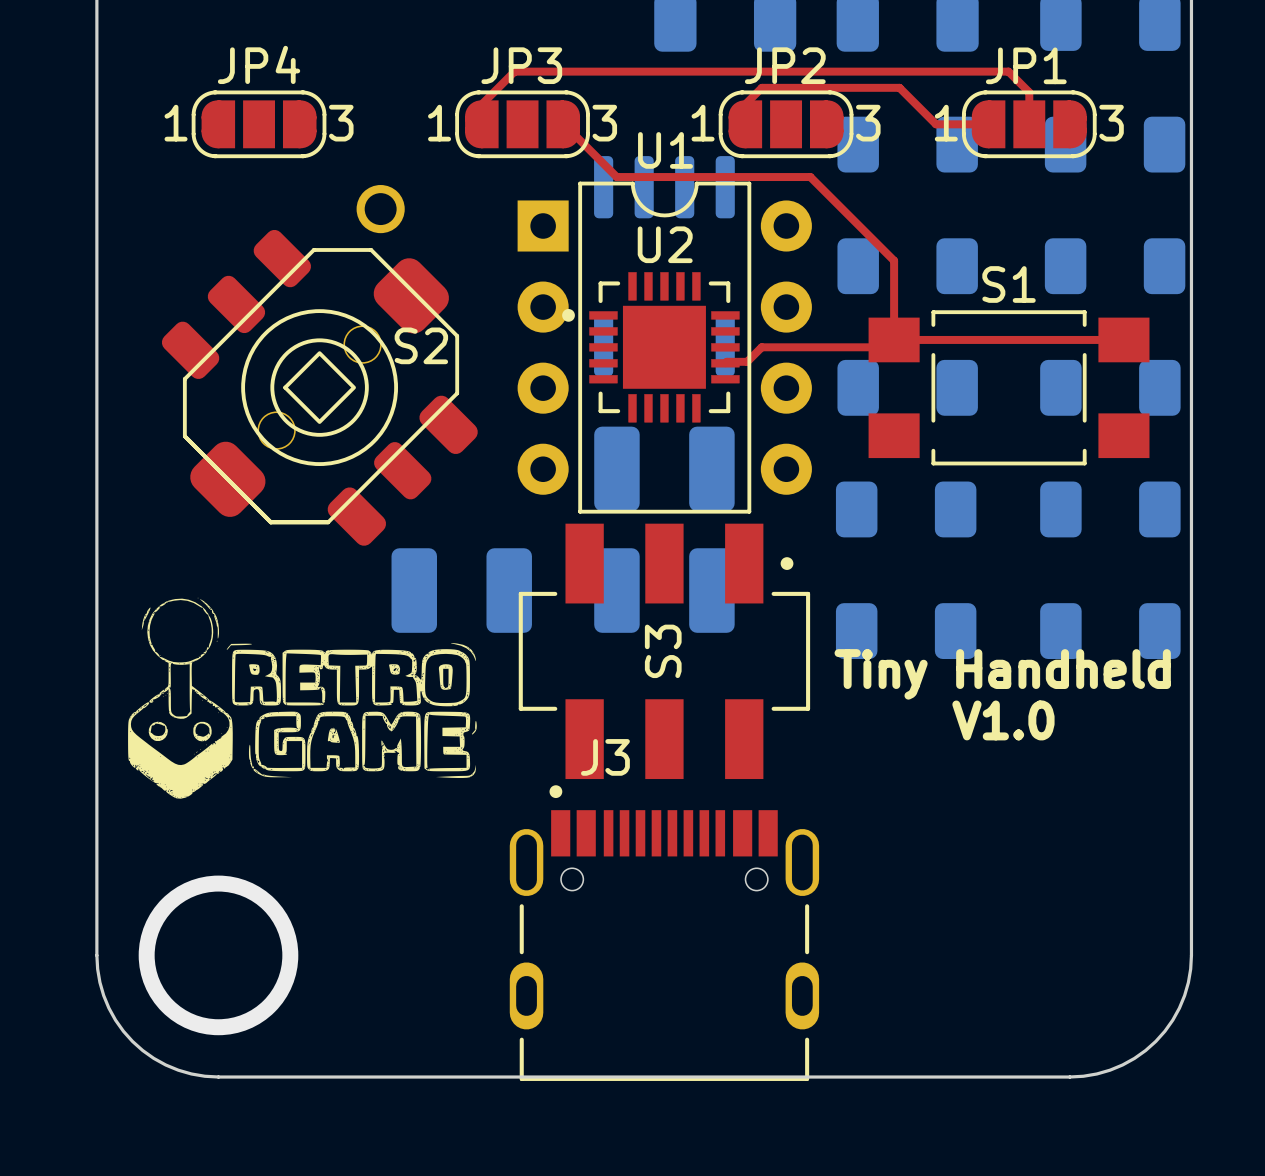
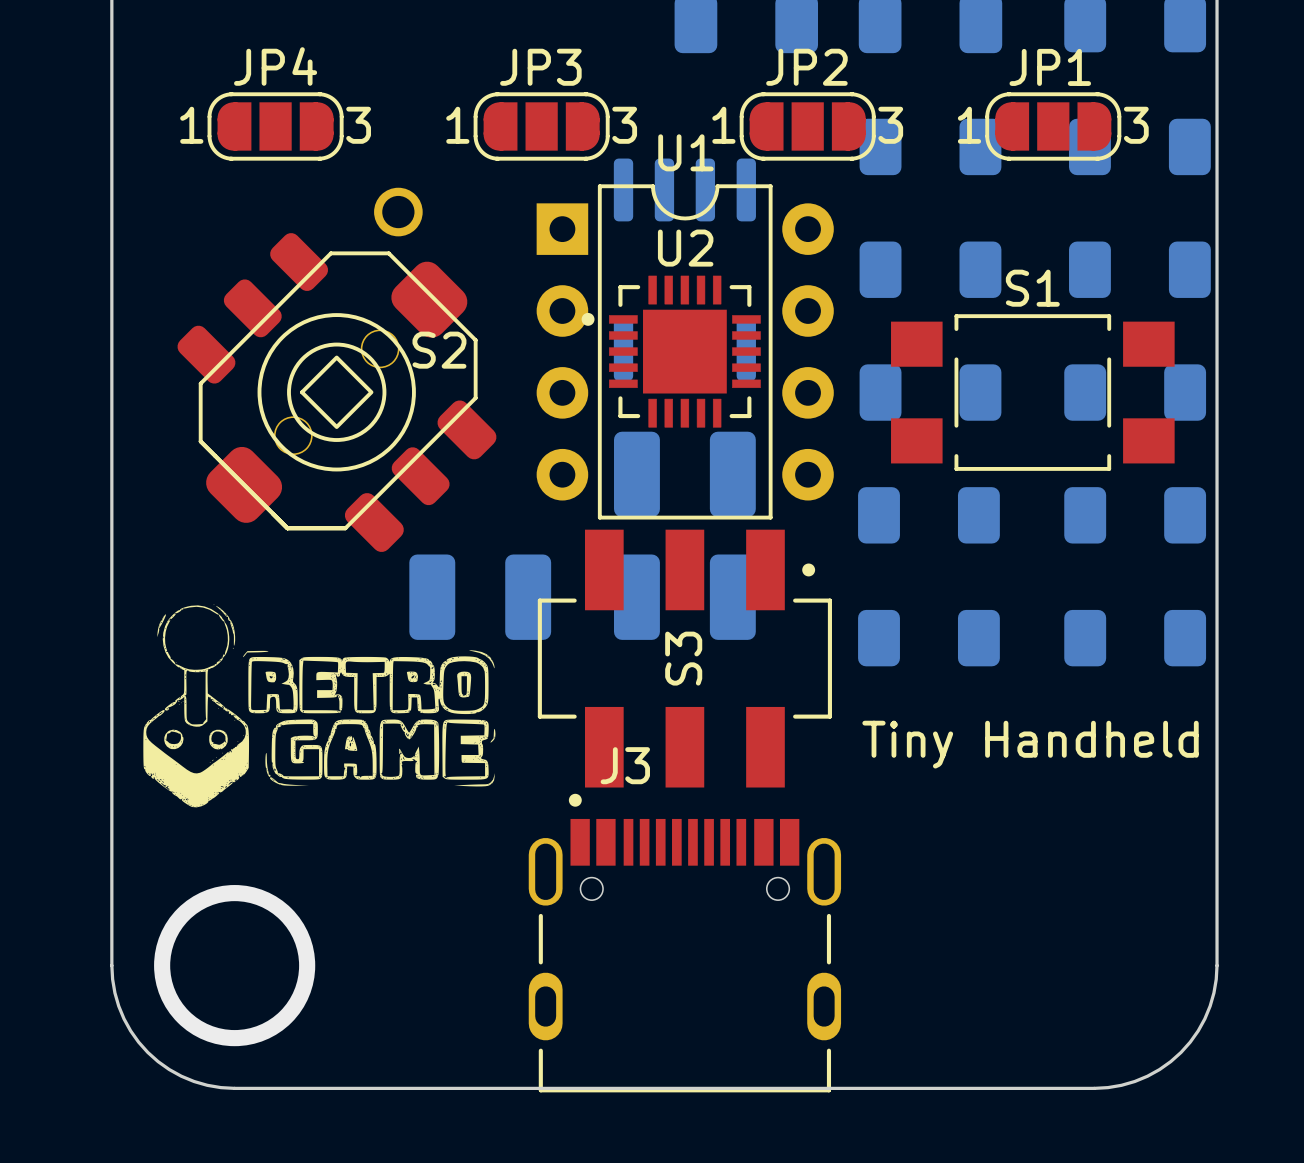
top track: (481, 124) (481, 105) (514, 71) (1008, 71) (1029, 92) (1029, 124) -> none
top track: (564, 124) (616, 177) (810, 177) (894, 260) (894, 339) -> none
top track: (744, 124) (744, 105) (761, 87) (899, 87) (936, 124) (987, 124) -> none
top track: (894, 339) (1123, 339) -> none
top track: (894, 339) (886, 347) (761, 347) (747, 361) (725, 363) -> none
text: Tiny Handheld (1002, 674) -> none
text: V1.0 (1003, 720) -> Tiny Handheld (1030, 744)

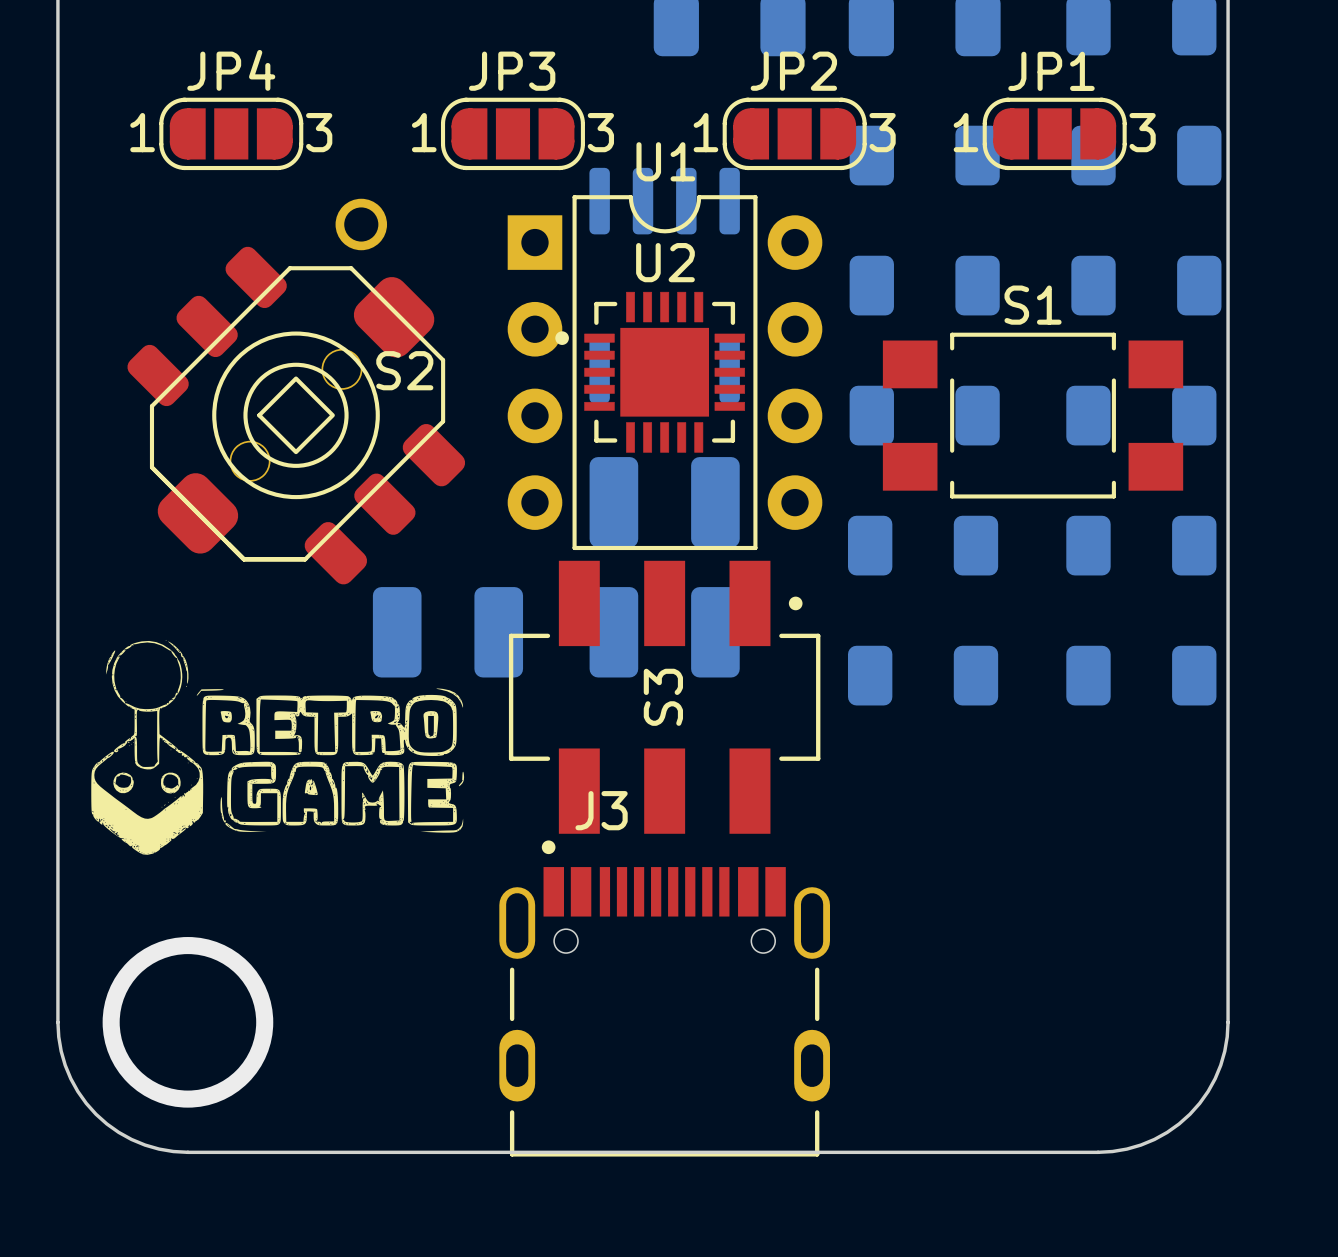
text: Tiny Handheld (1030, 744) -> none

